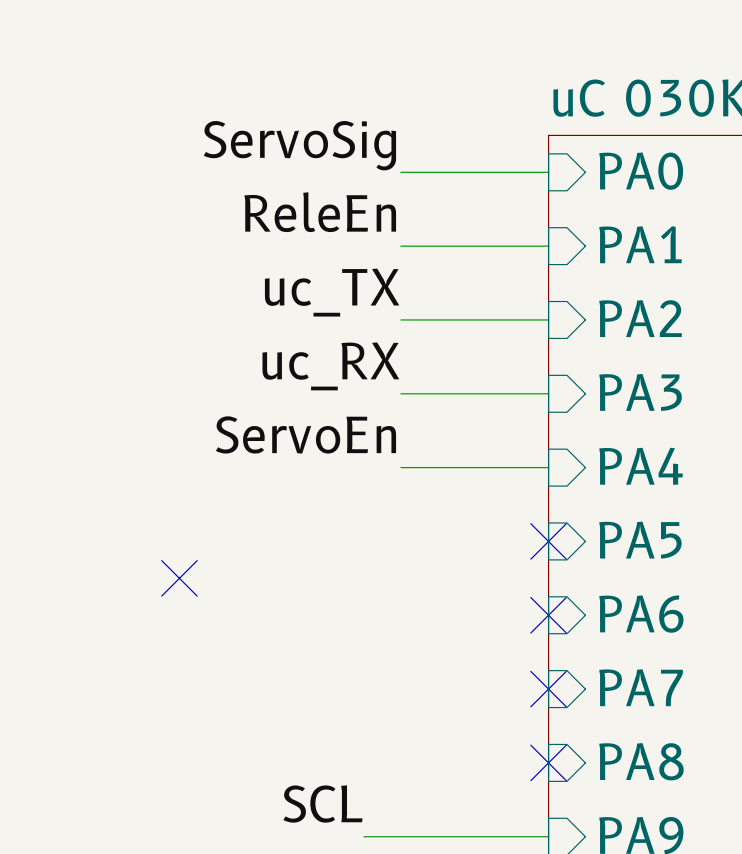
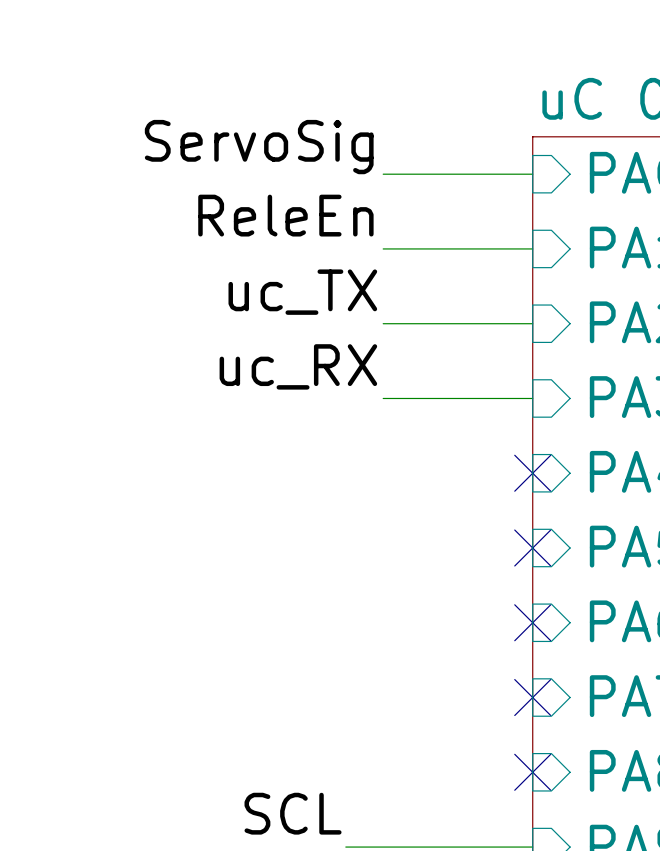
label: ServoEn (305, 434) -> none
wire: (400, 467) (548, 467) -> none
no-connect mark: none -> (532, 473)
no-connect mark: (179, 578) -> none

